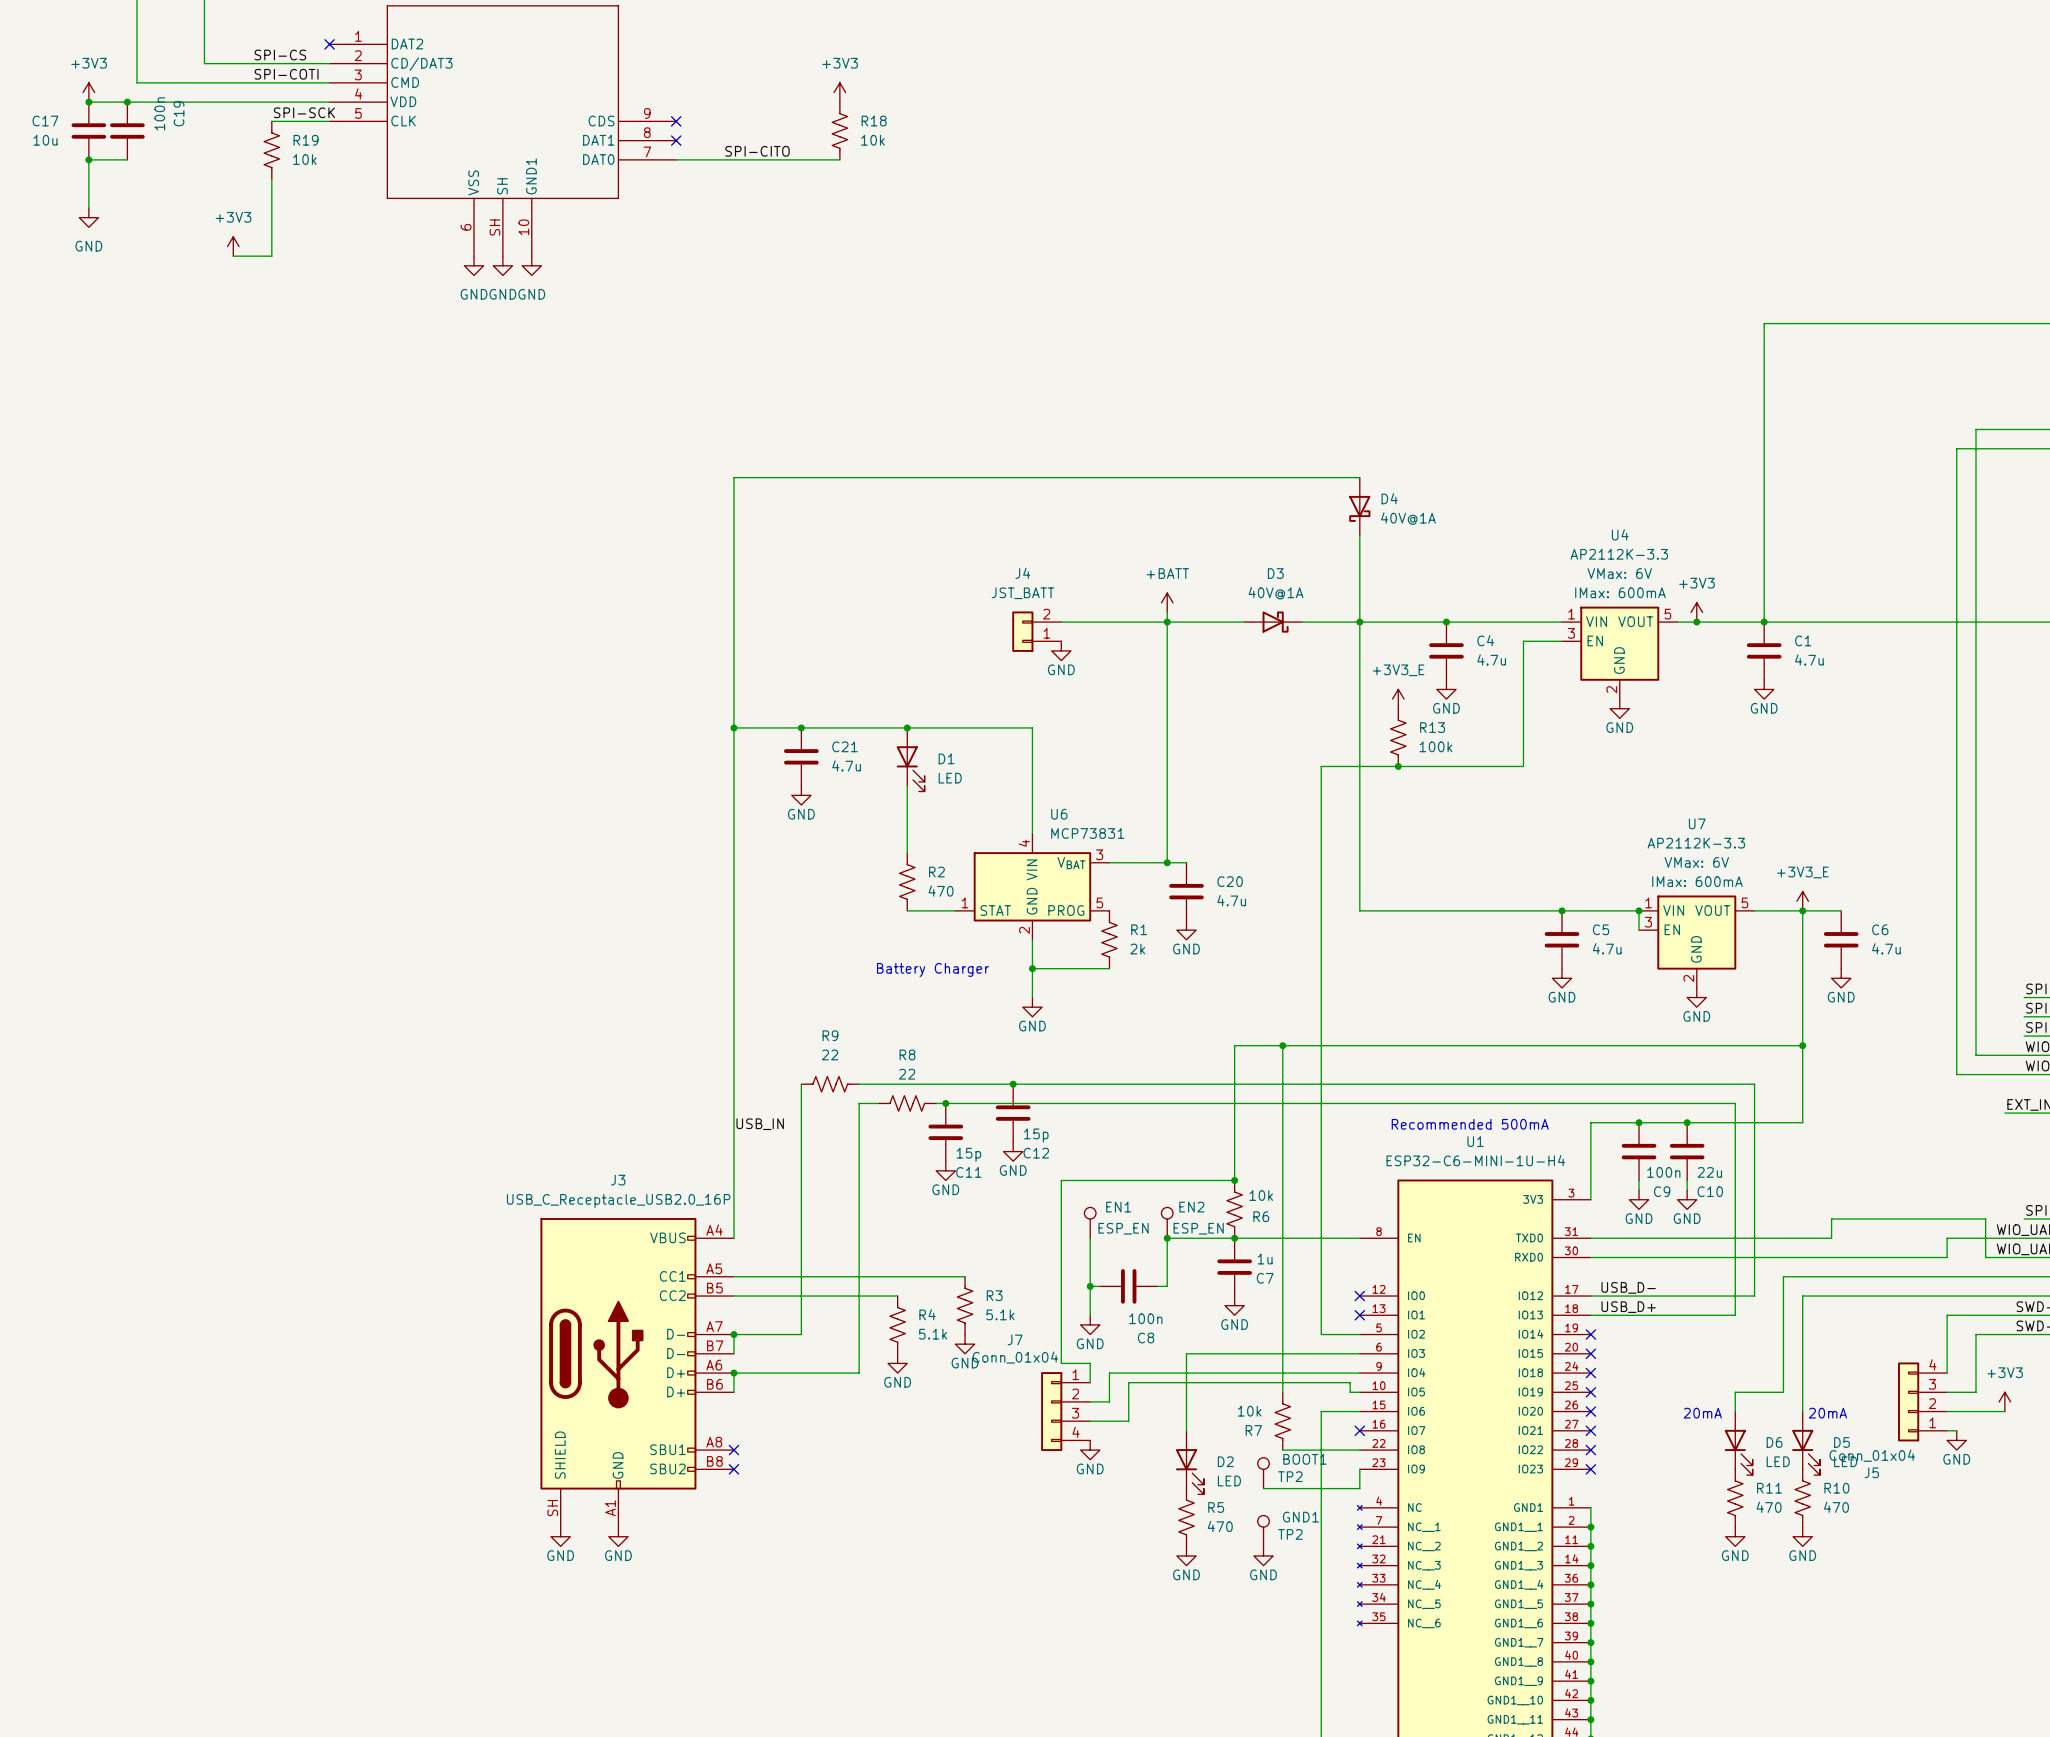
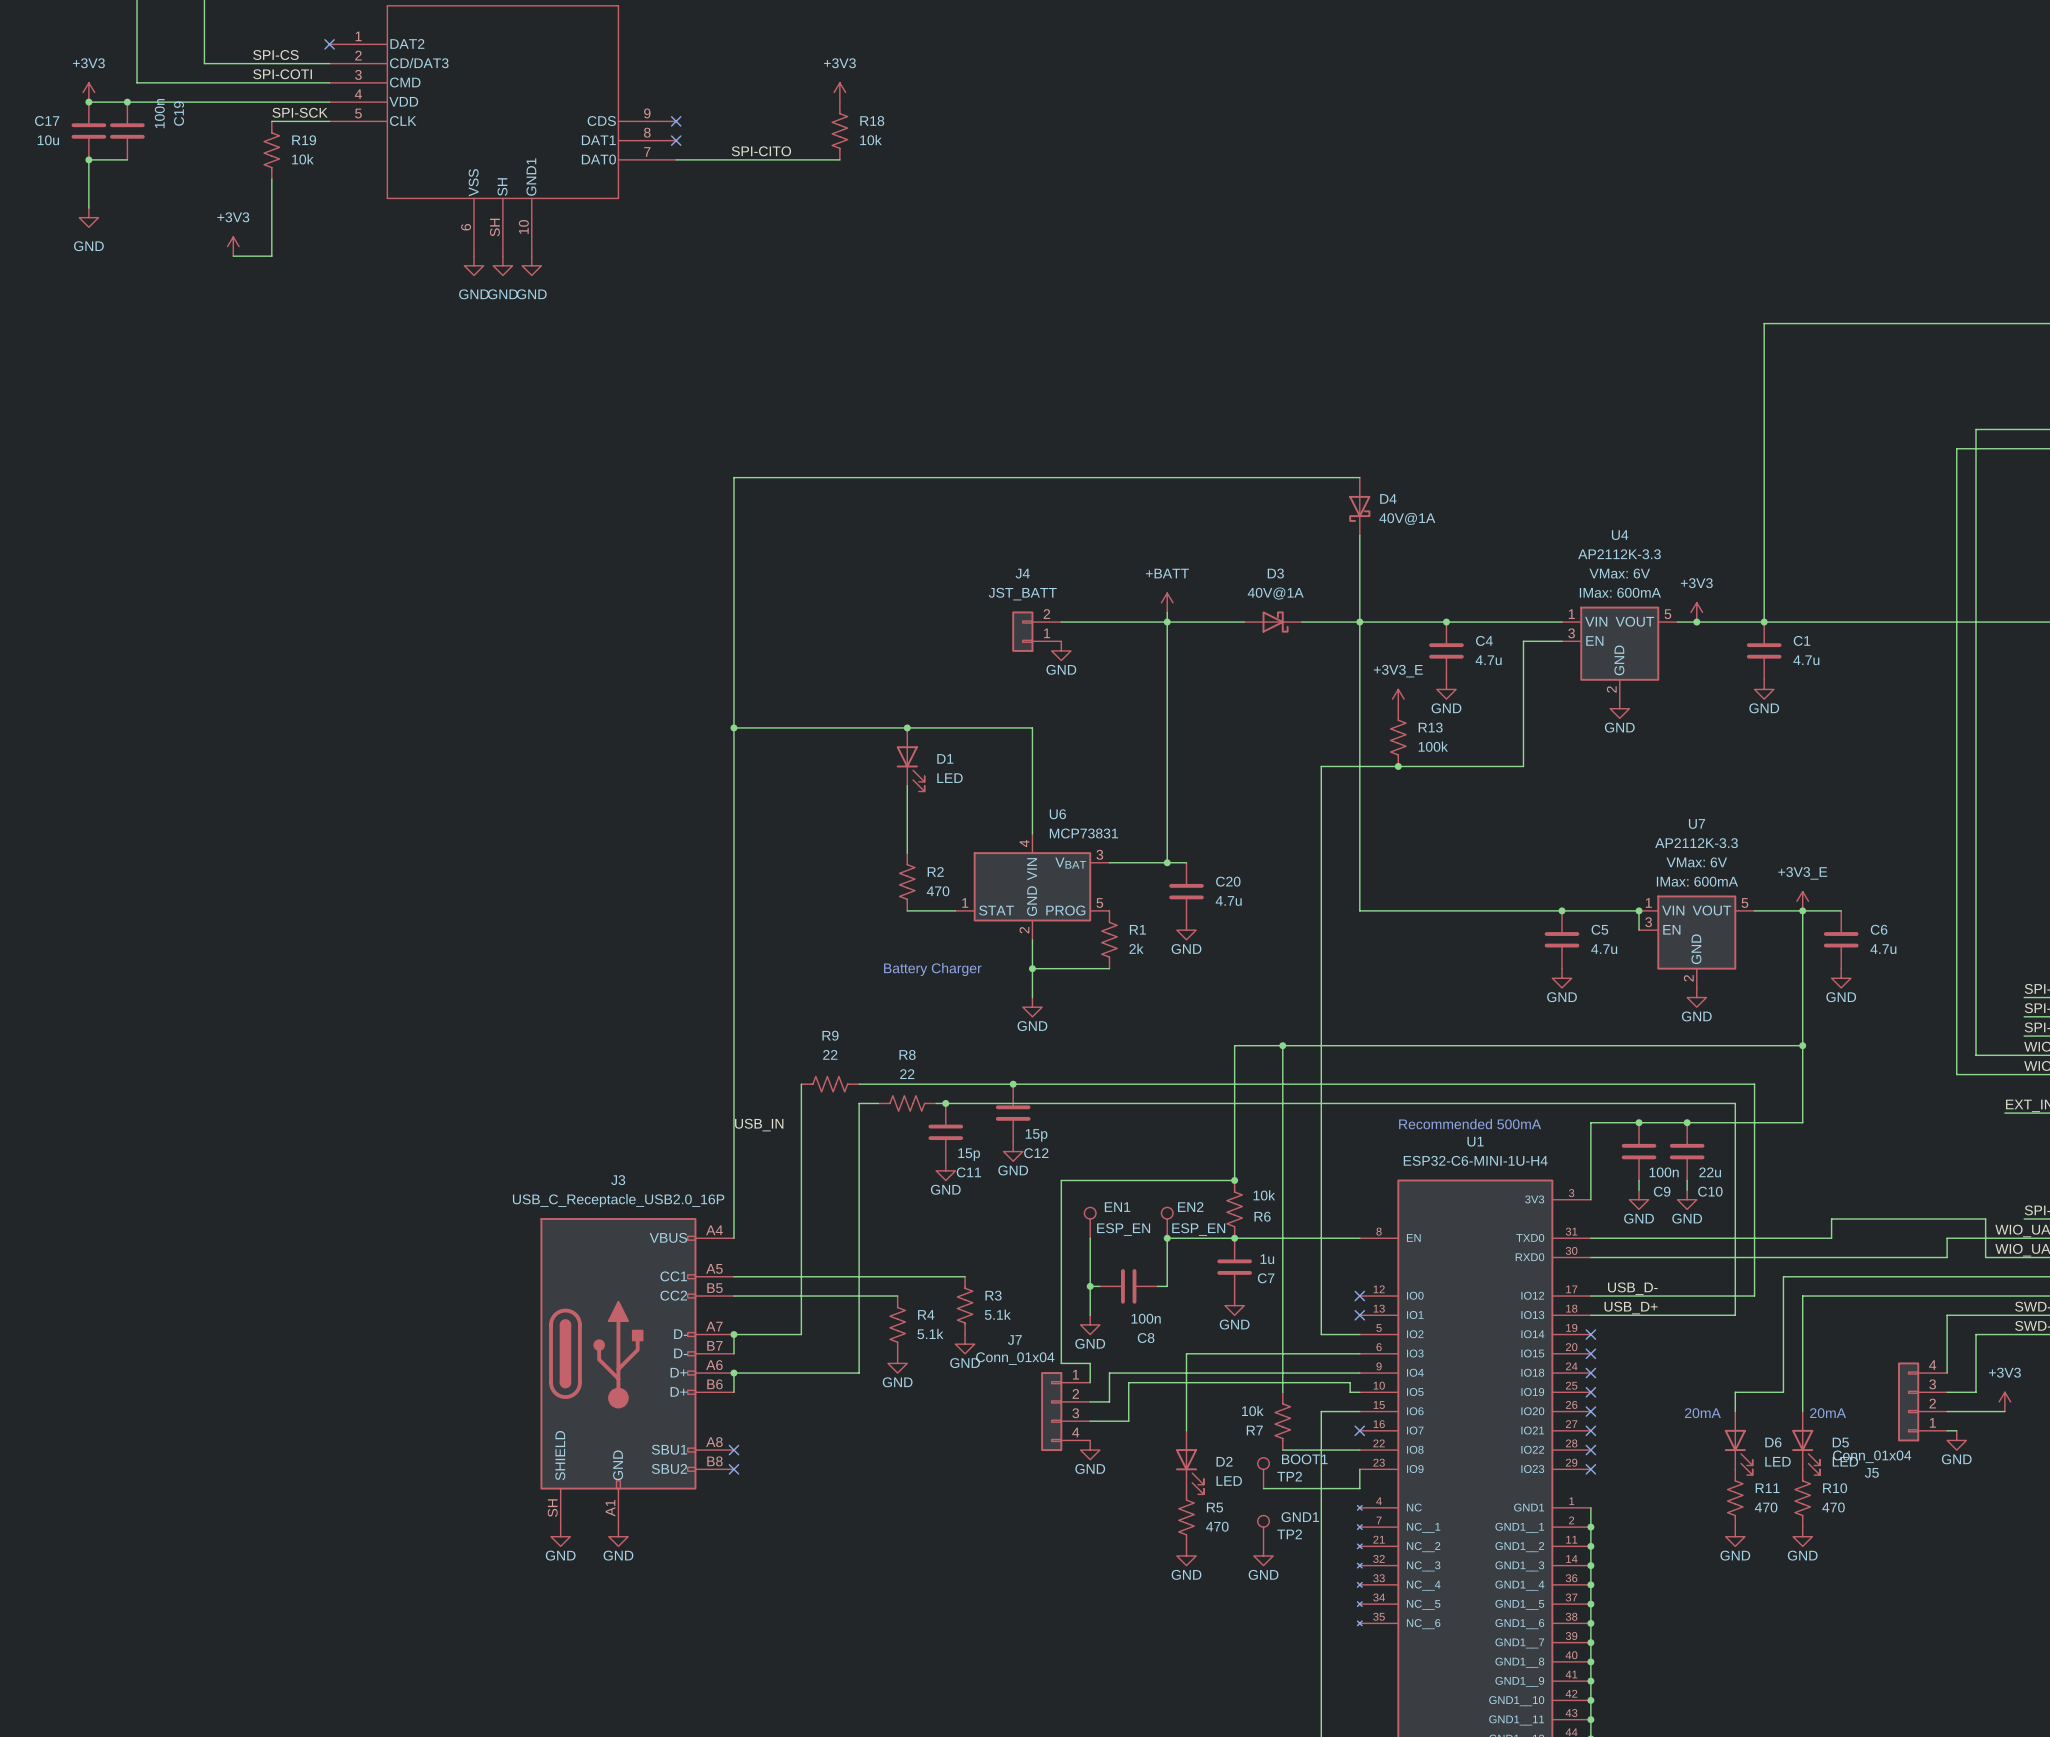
junction: (801, 727) -> none
C21: 4.7u (801, 756) -> none
power symbol: GND (801, 795) -> none

